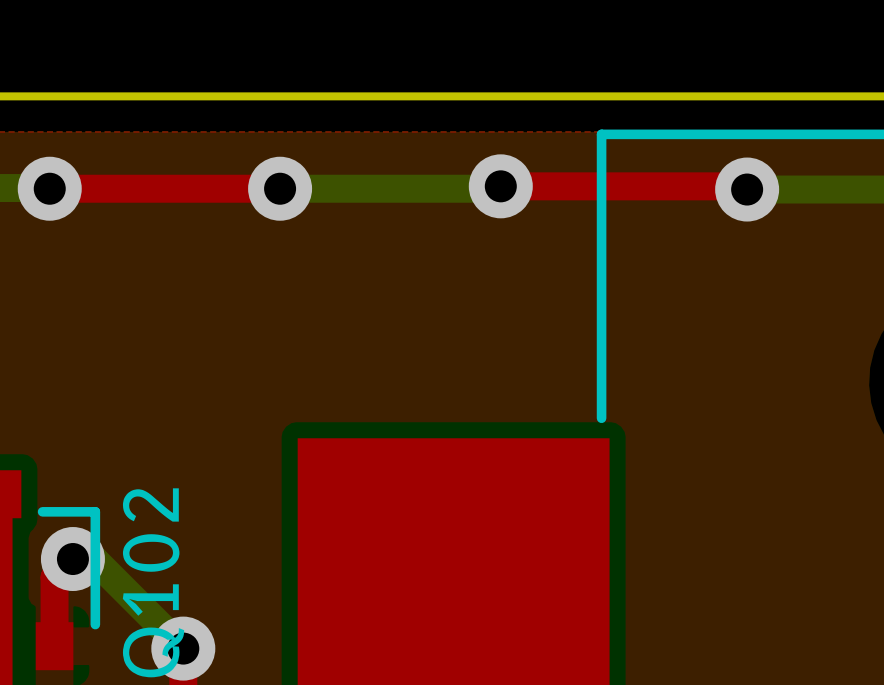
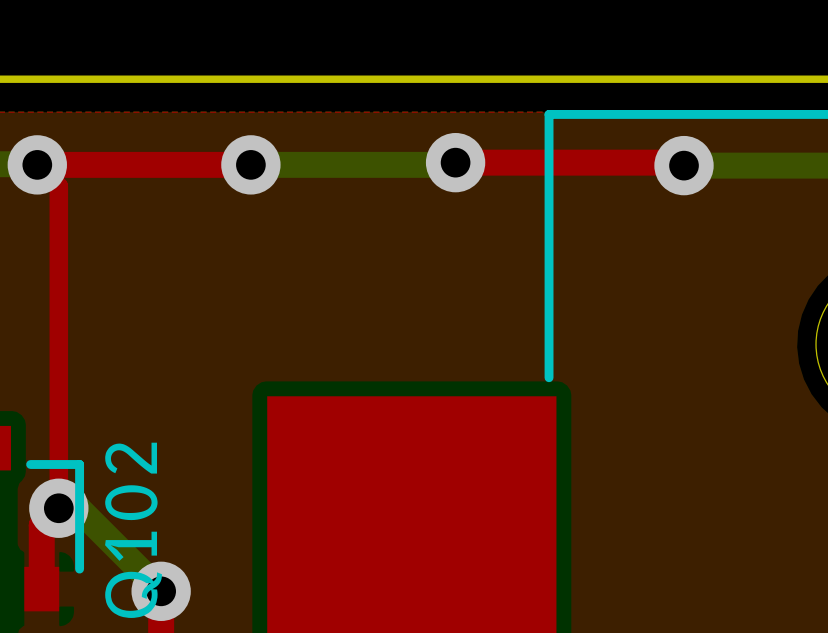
top track: none -> (37, 164) (58, 186) (58, 508)

